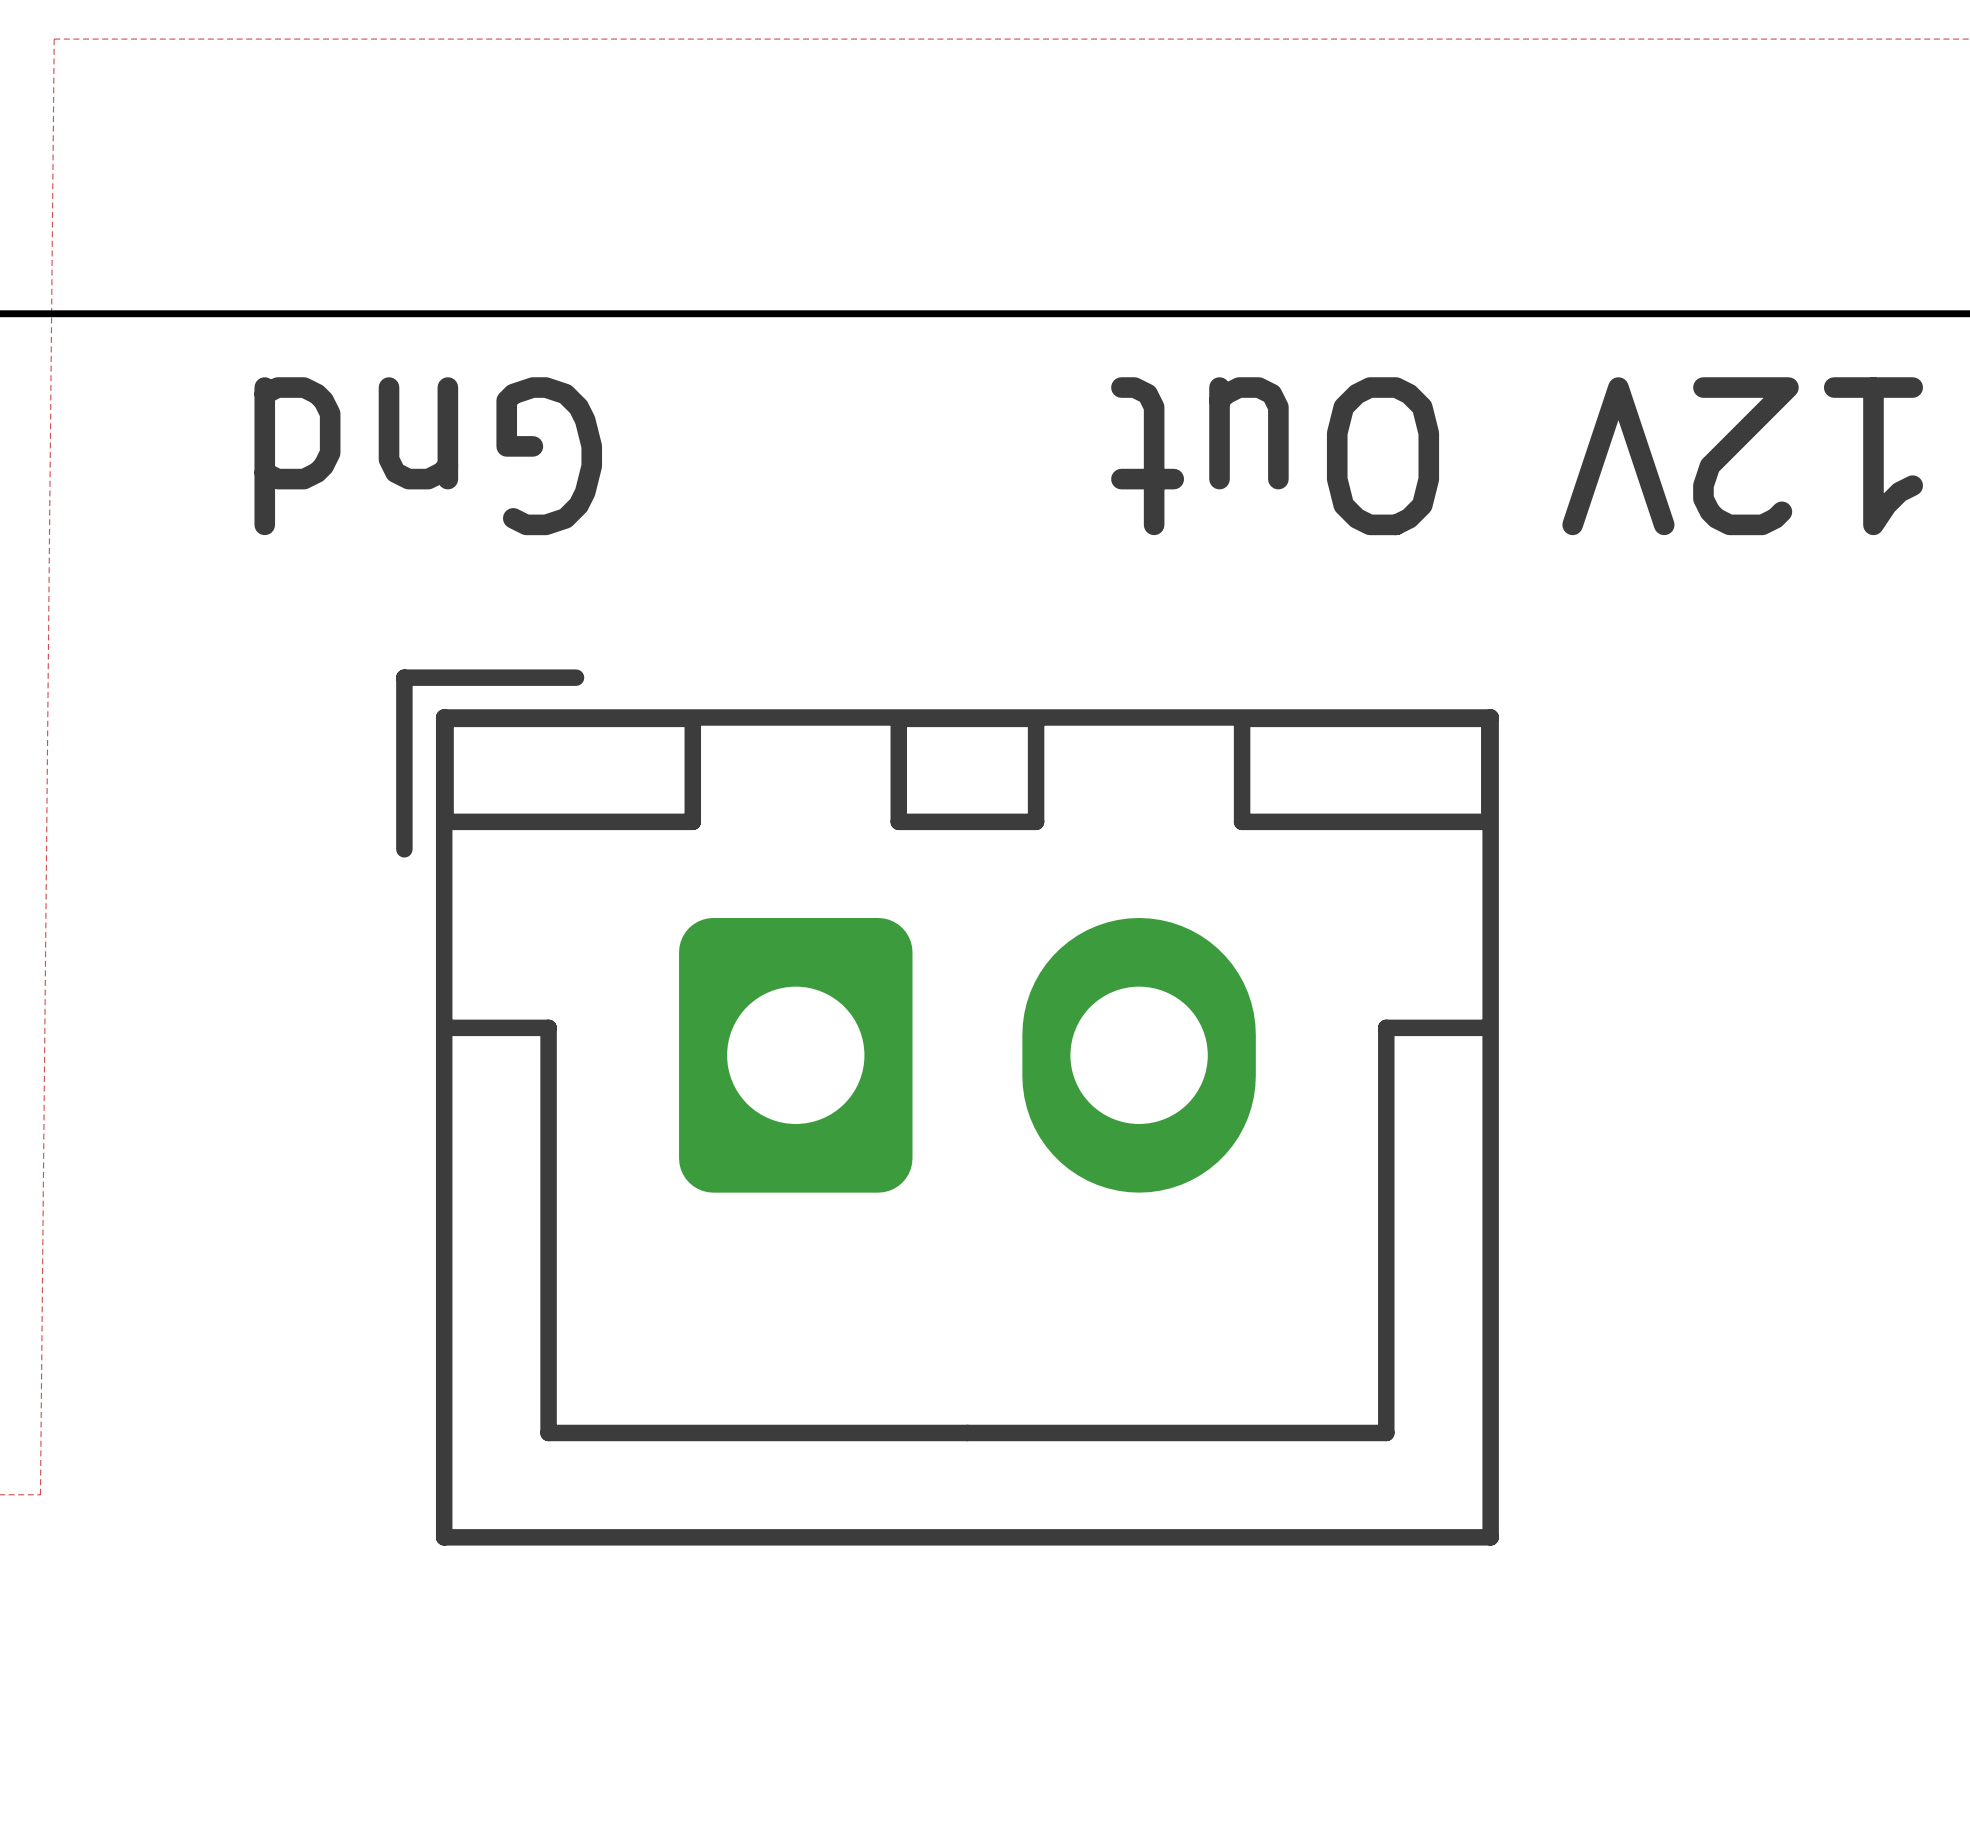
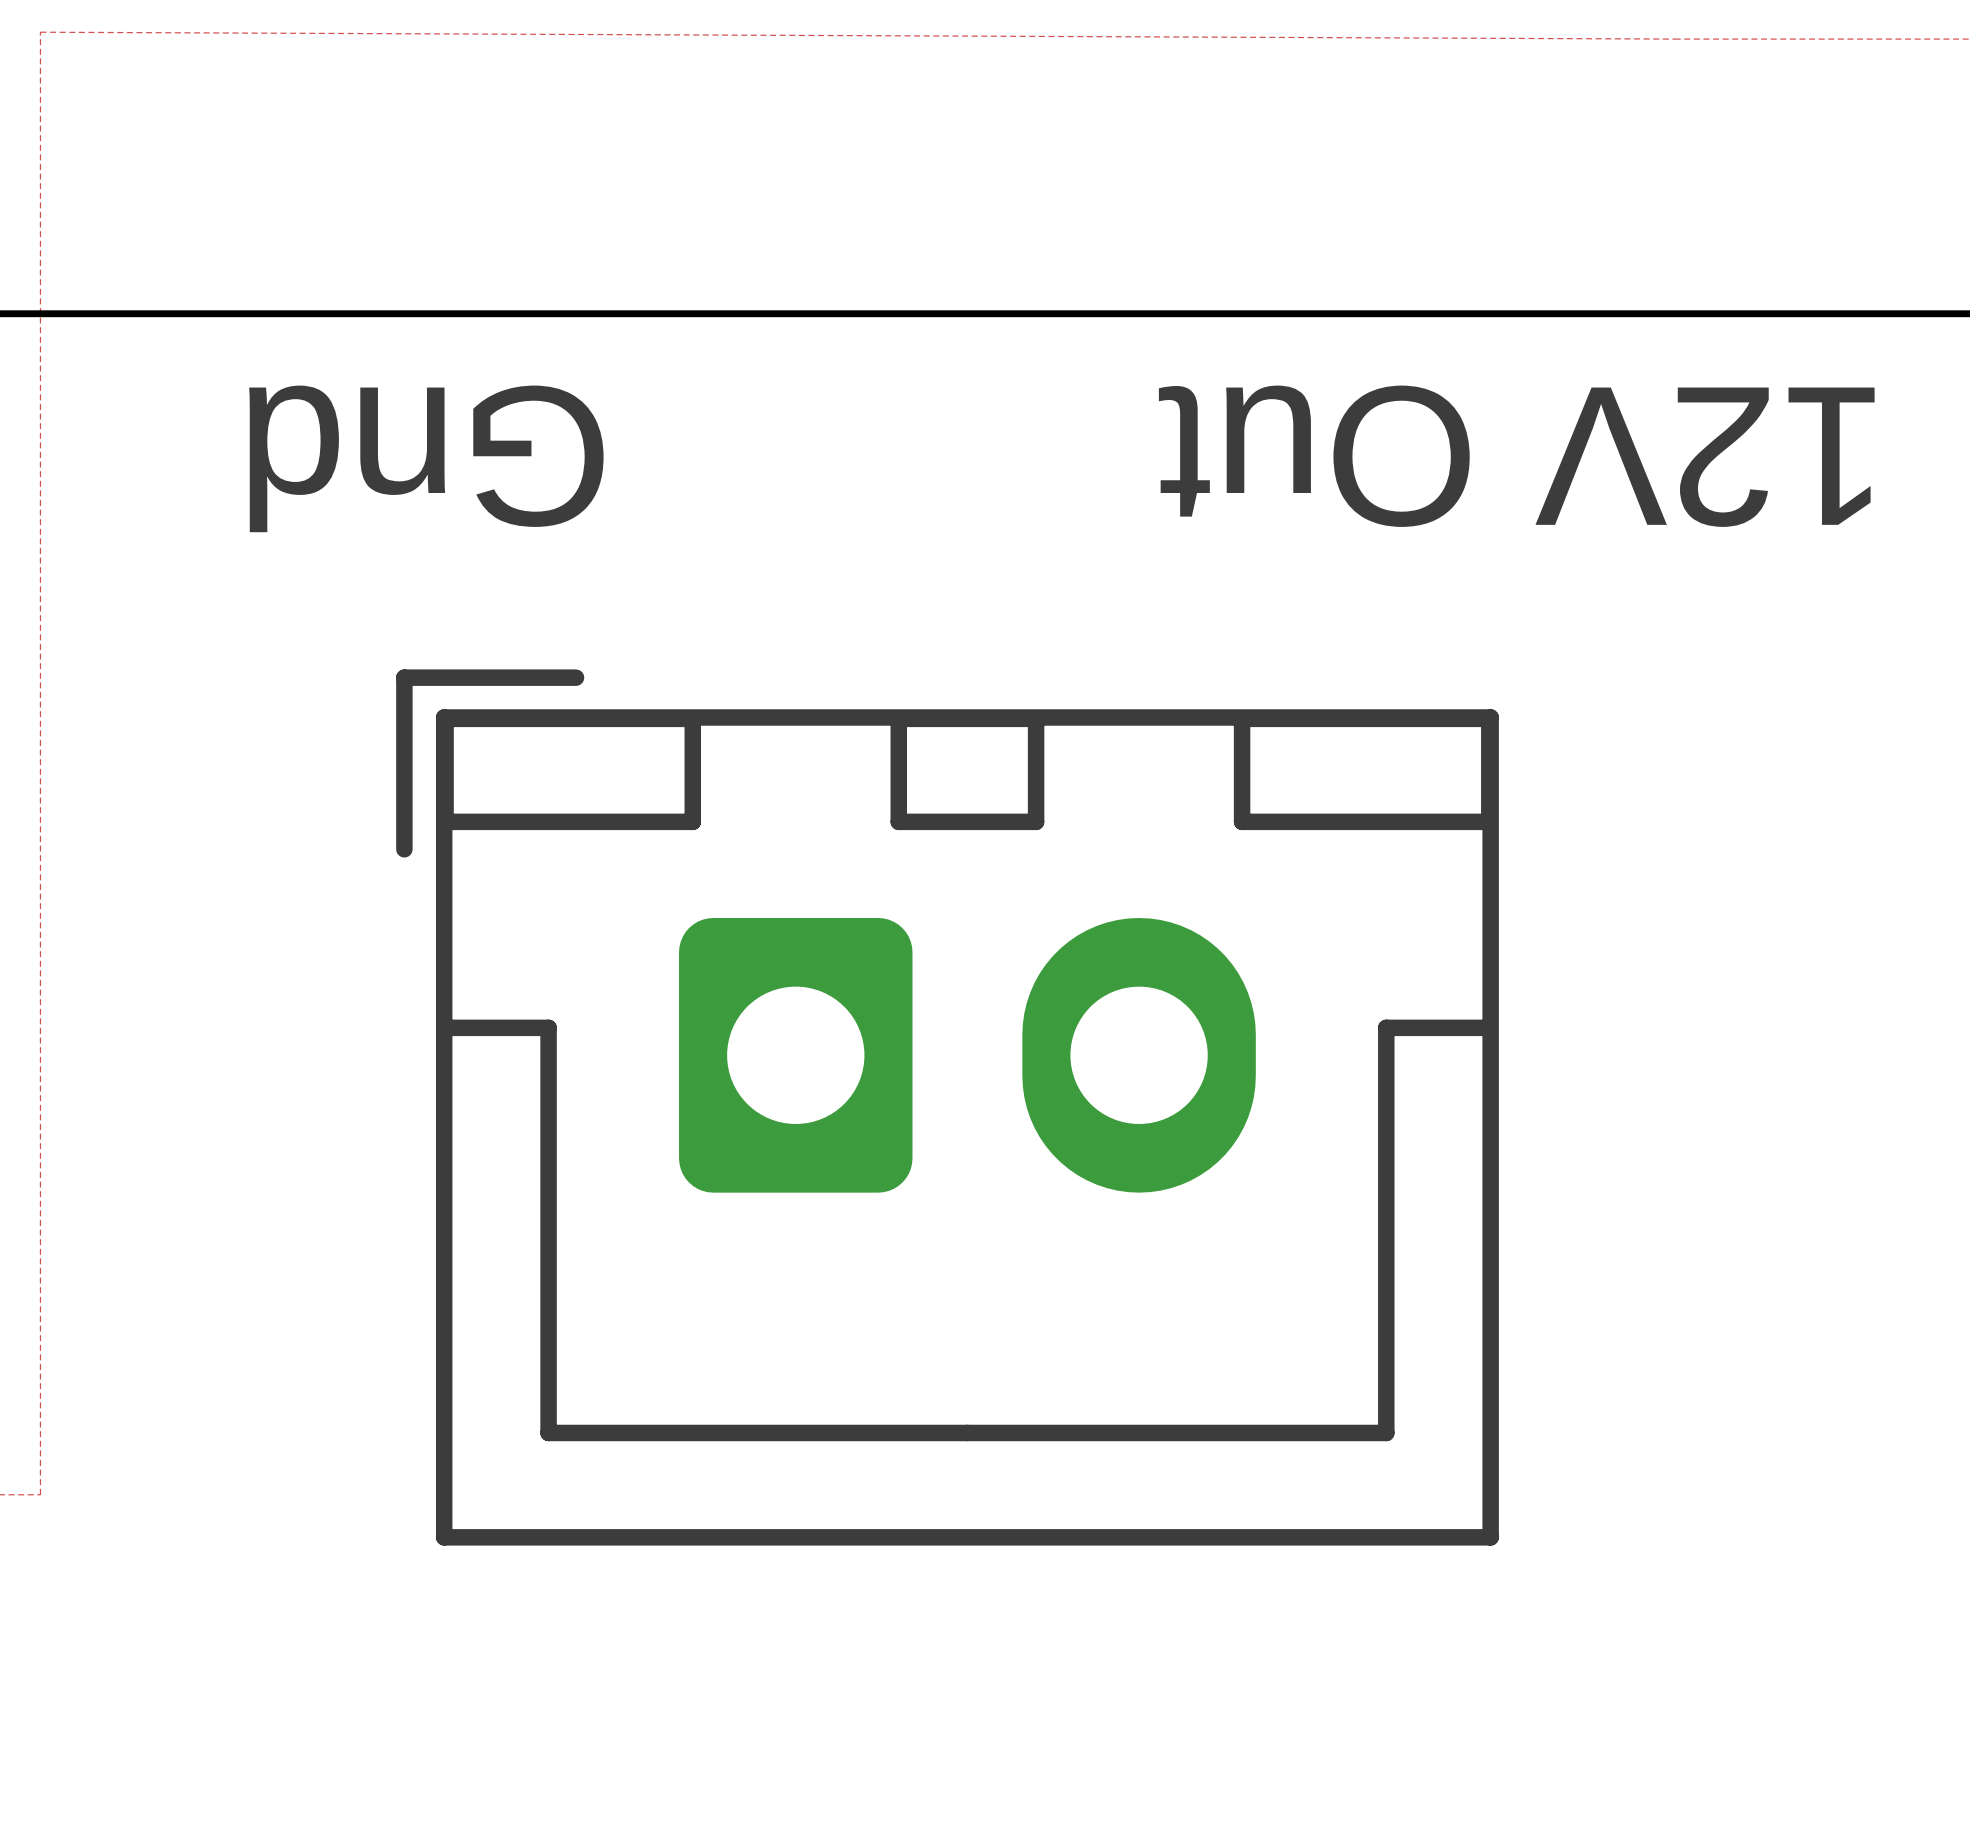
zone outline: (1674, 39) (54, 39) (40, 1494) -> (1674, 39) (40, 32) (40, 1494)

